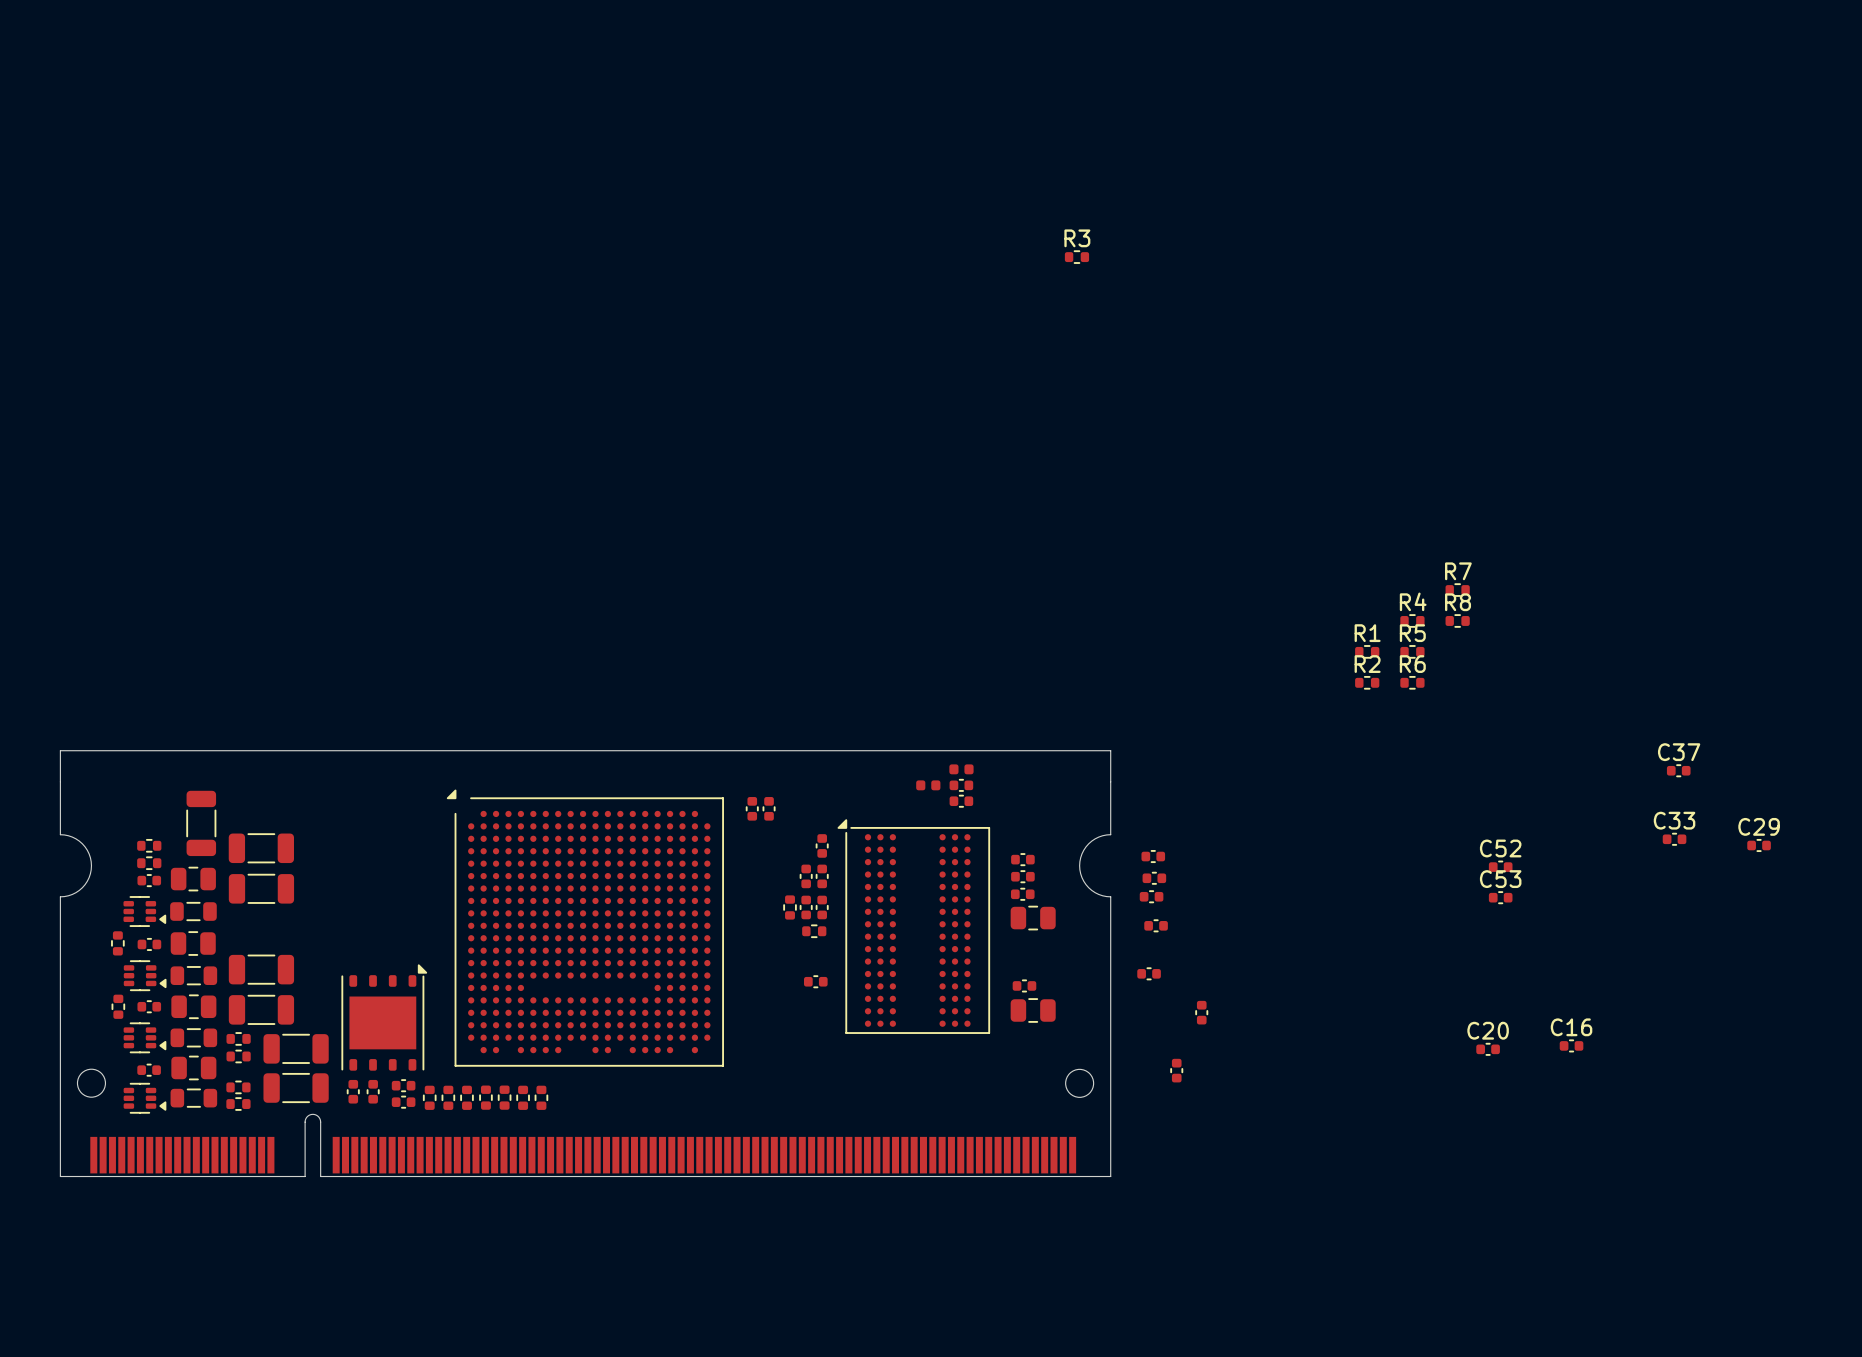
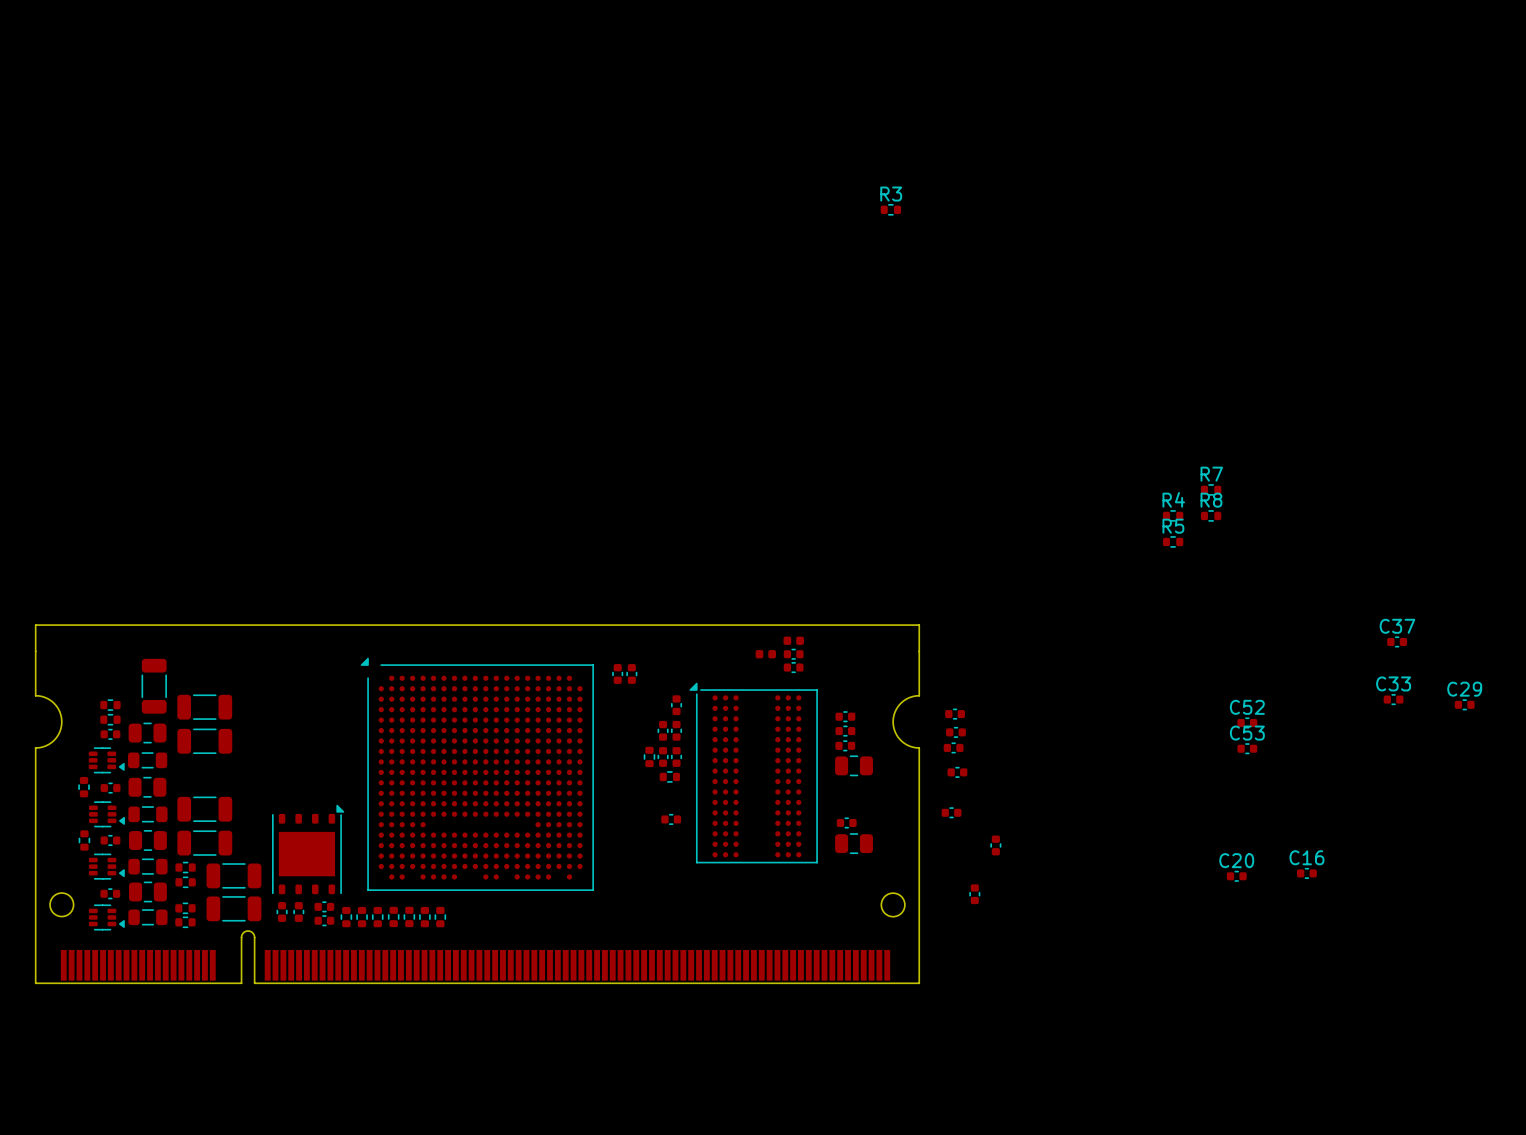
R1: (1367, 651) -> none
R2: (1367, 682) -> none
R6: (1412, 682) -> none

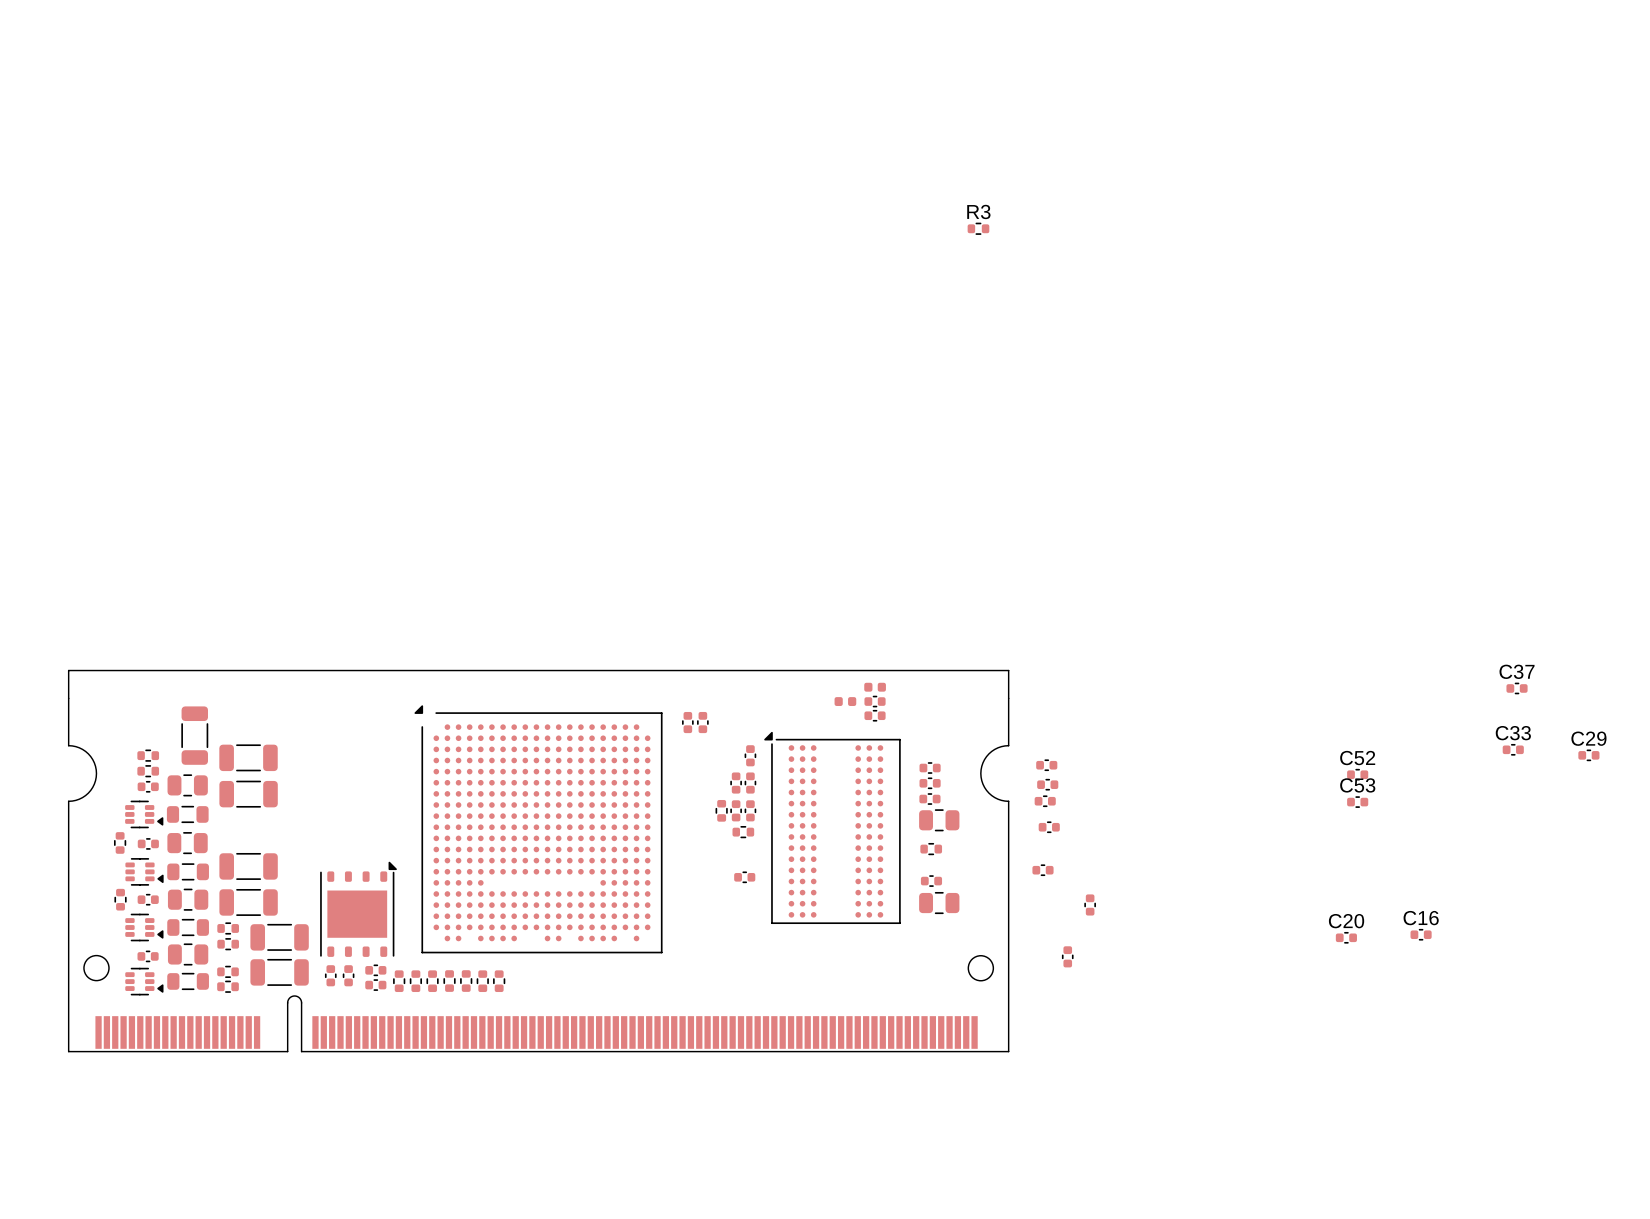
R7: (1211, 489) -> none
R4: (1173, 515) -> none
R8: (1211, 515) -> none
R5: (1173, 541) -> none
part: none -> (931, 849)

